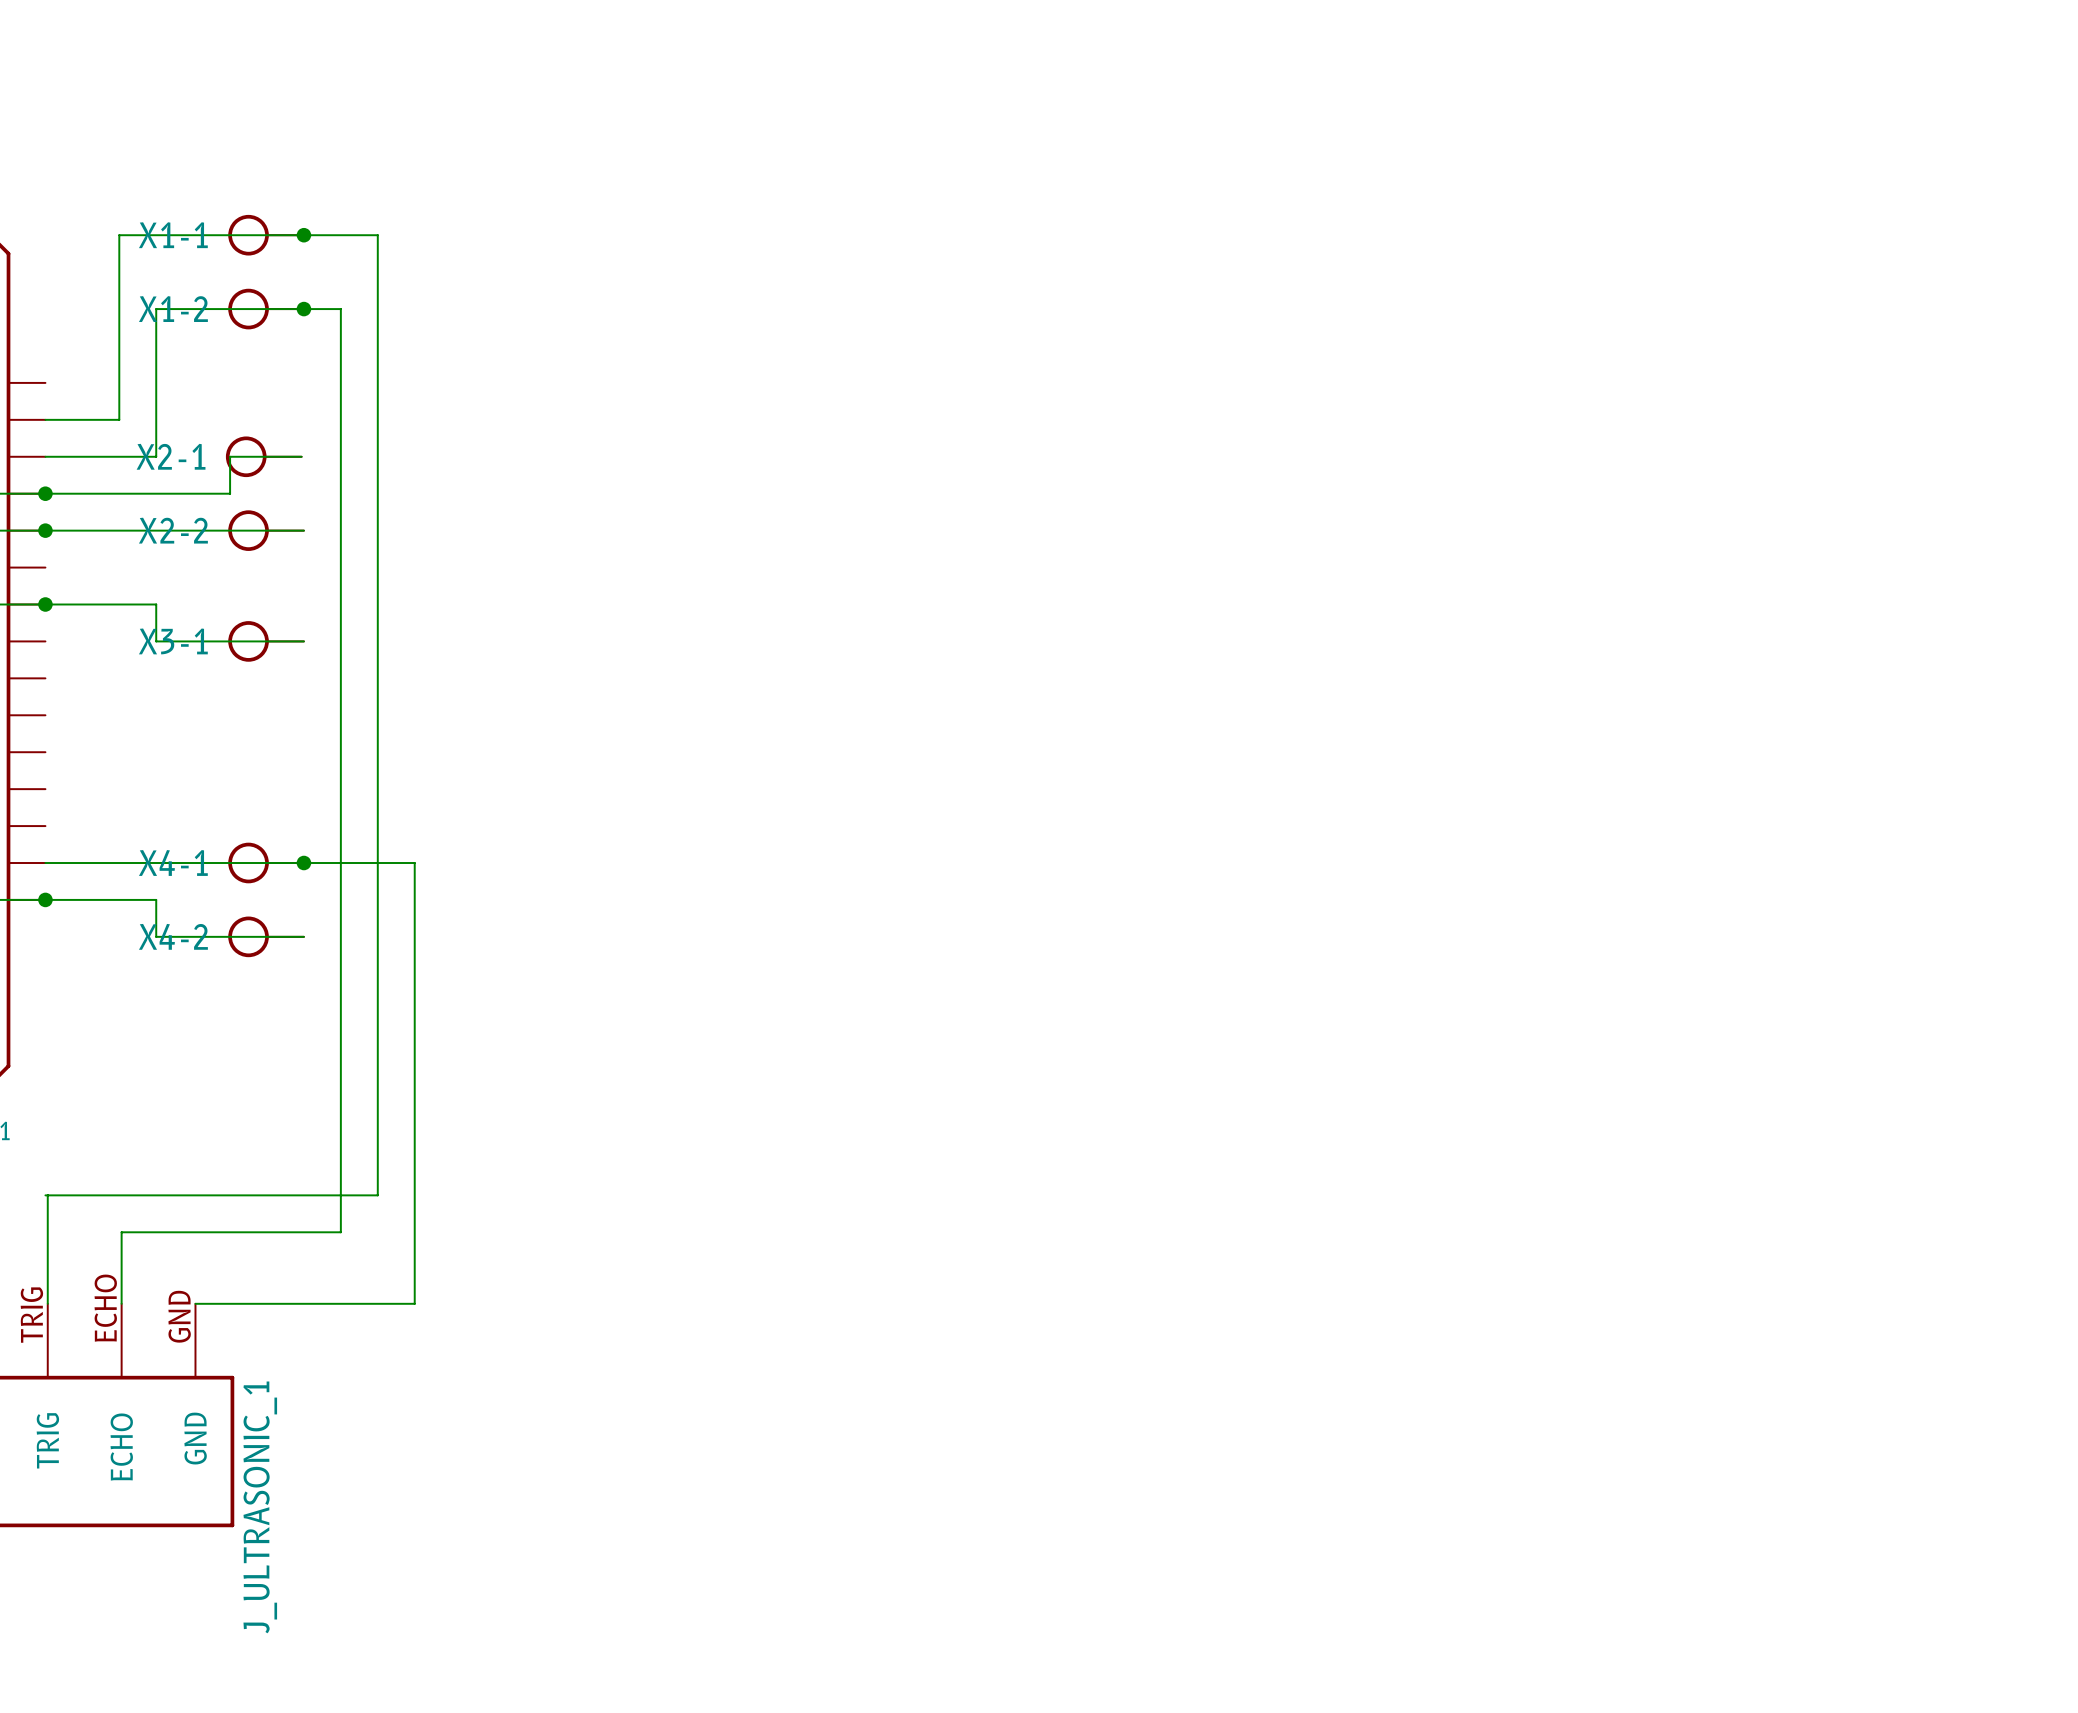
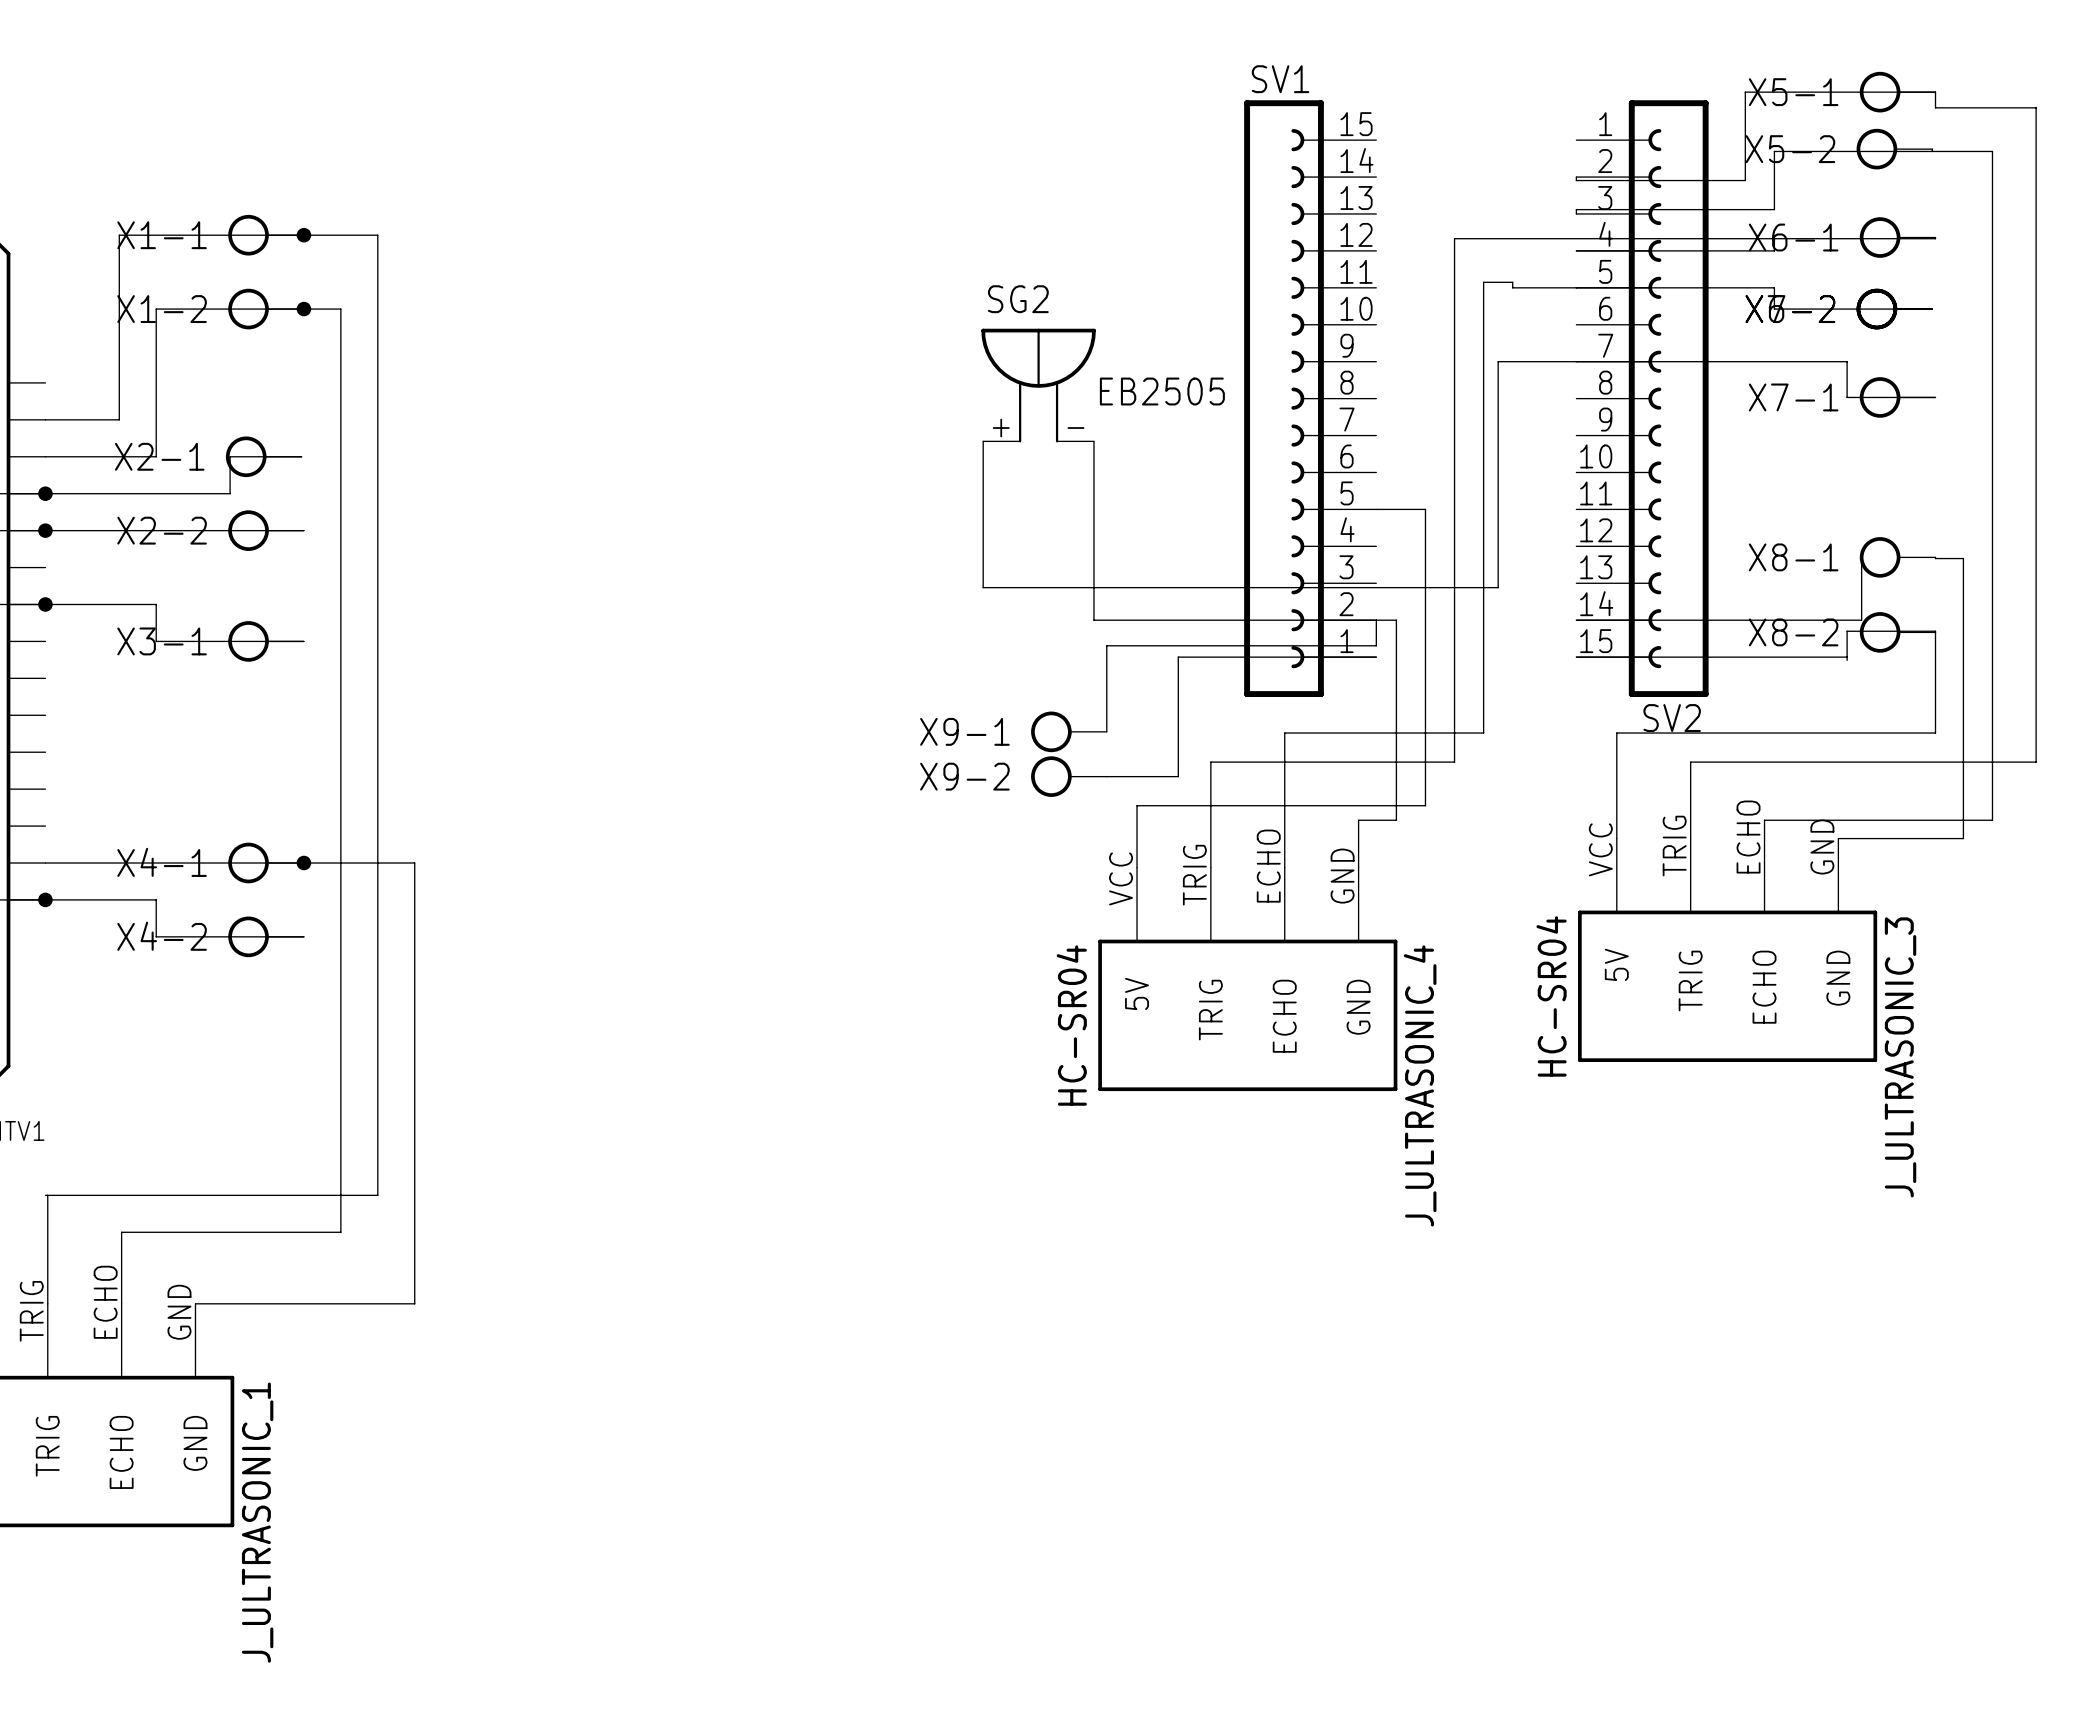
X5-1: none -> (1897, 92)
X5-2: none -> (1894, 149)
wire: none -> (1932, 149) (1932, 151)
wire: none -> (1576, 177) (1576, 180) (1745, 180) (1745, 92) (1935, 92) (1935, 107) (2036, 107) (2036, 762) (1690, 762) (1690, 838)
wire: none -> (1576, 213) (1576, 209) (1774, 209) (1774, 151) (1992, 151) (1992, 820) (1764, 820) (1764, 838)
X6-1: none -> (1897, 237)
wire: none -> (1935, 237) (1454, 238) (1454, 762) (1210, 762) (1210, 867)
wire: none -> (1774, 238) (1774, 250) (1576, 250)
part: none -> (1894, 309)
part: none -> (1894, 309)
wire: none -> (1932, 309) (1774, 309) (1774, 287) (1512, 287) (1512, 282) (1483, 282) (1483, 733) (1284, 733) (1284, 867)
SG2: none -> EB2505 (1038, 385)
X7-1: none -> (1897, 397)
wire: none -> (1935, 397) (1847, 397) (1847, 361) (1498, 361) (1498, 587) (983, 587) (983, 441)
SV1: none -> (1310, 398)
SV2: none -> (1642, 398)
wire: none -> (1093, 441) (1093, 620) (1396, 620) (1396, 820) (1358, 820) (1358, 867)
wire: none -> (1376, 509) (1425, 509) (1425, 805) (1137, 805) (1137, 867)
wire: none -> (1861, 557) (1861, 620) (1576, 620)
X8-1: none -> (1897, 557)
wire: none -> (1935, 557) (1963, 558) (1963, 838) (1838, 838)
wire: none -> (1376, 620) (1376, 645) (1106, 645) (1106, 731)
X8-2: none -> (1897, 632)
wire: none -> (1376, 657) (1178, 657) (1178, 776) (1106, 776)
wire: none -> (1576, 657) (1847, 657)
wire: none -> (1847, 660) (1847, 631) (1935, 631) (1935, 733) (1616, 733) (1616, 838)
X9-1: none -> (1068, 731)
X9-2: none -> (1068, 776)
J_ULTRASONIC_3: none -> HC-SR04 (1727, 950)
J_ULTRASONIC_4: none -> HC-SR04 (1247, 979)

